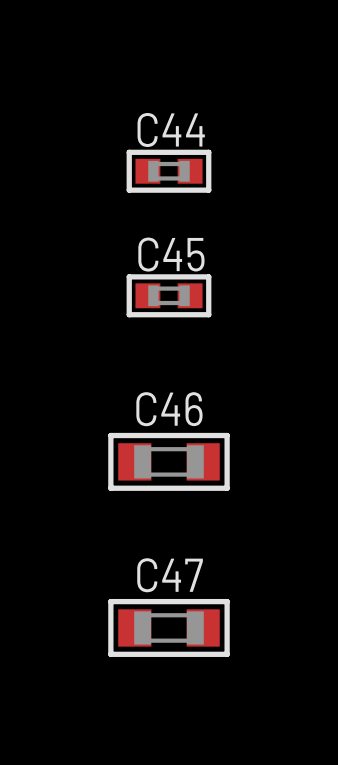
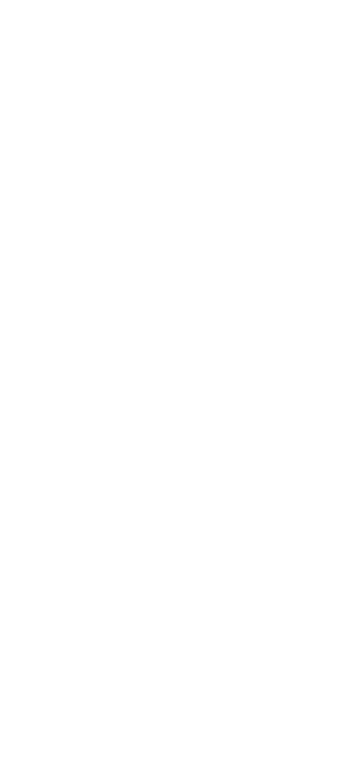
C44: (168, 171) -> none
C45: (168, 295) -> none
C46: (168, 461) -> none
C47: (168, 627) -> none

